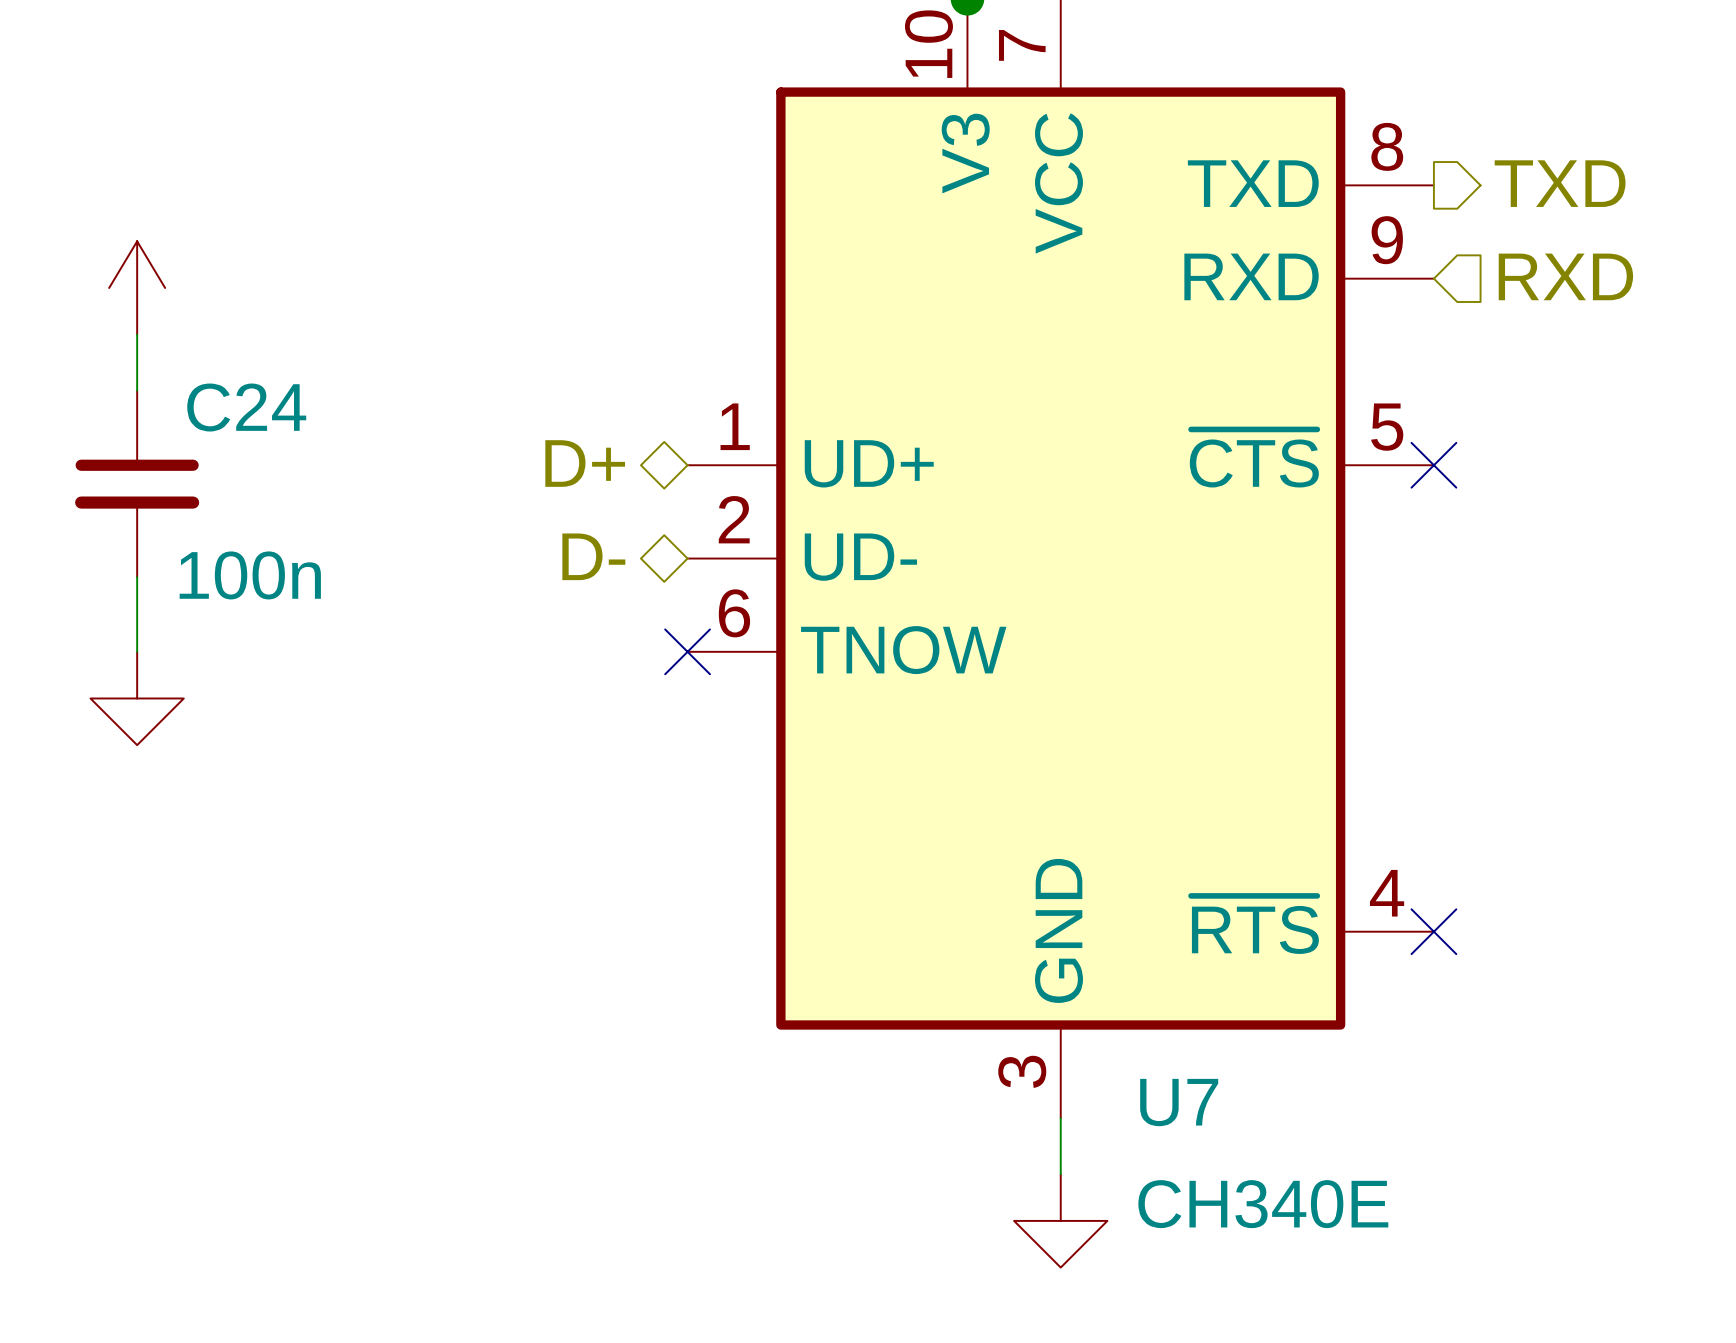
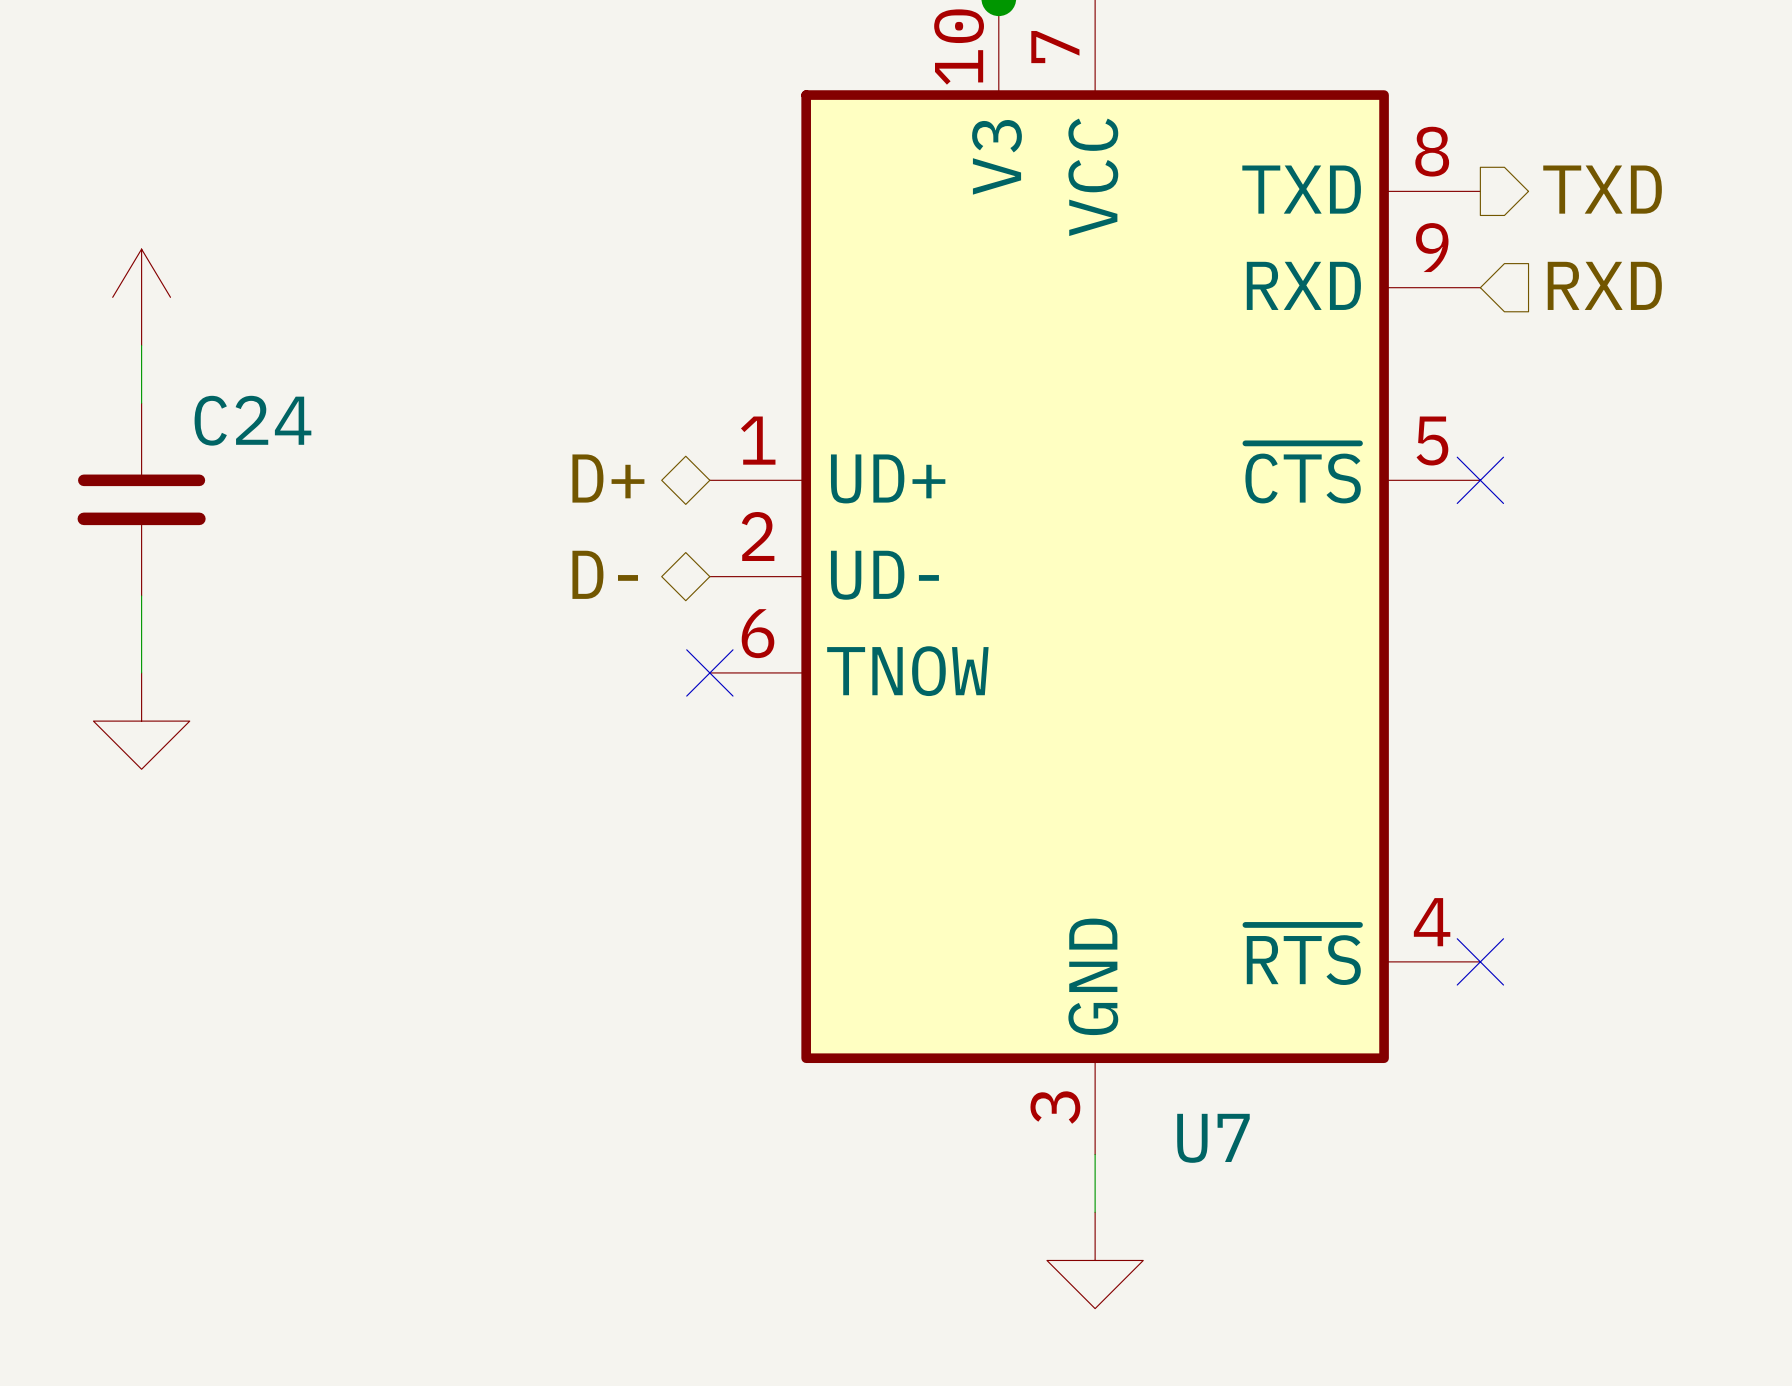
C24 value: 100n (250, 575) -> none
U7 value: CH340E (1263, 1204) -> none

